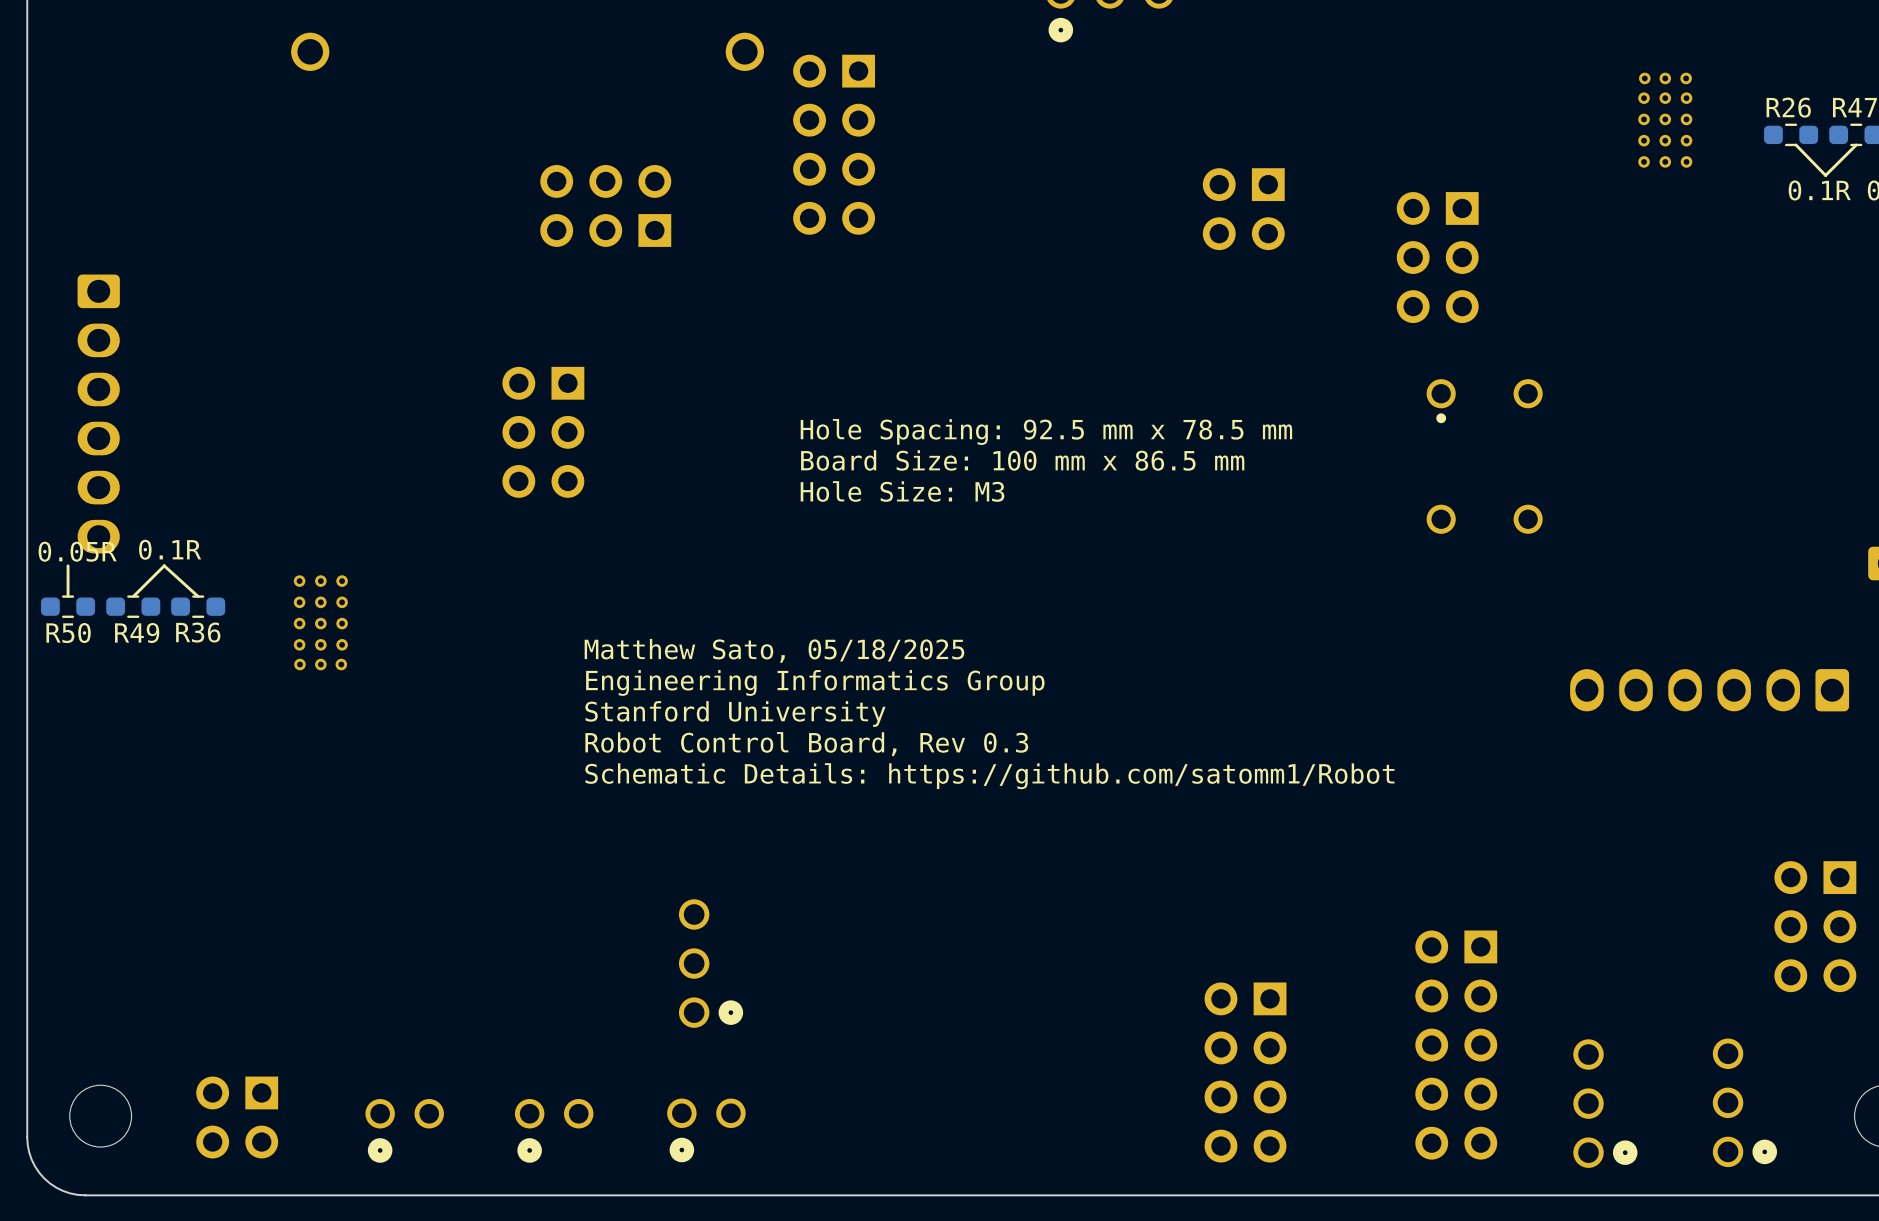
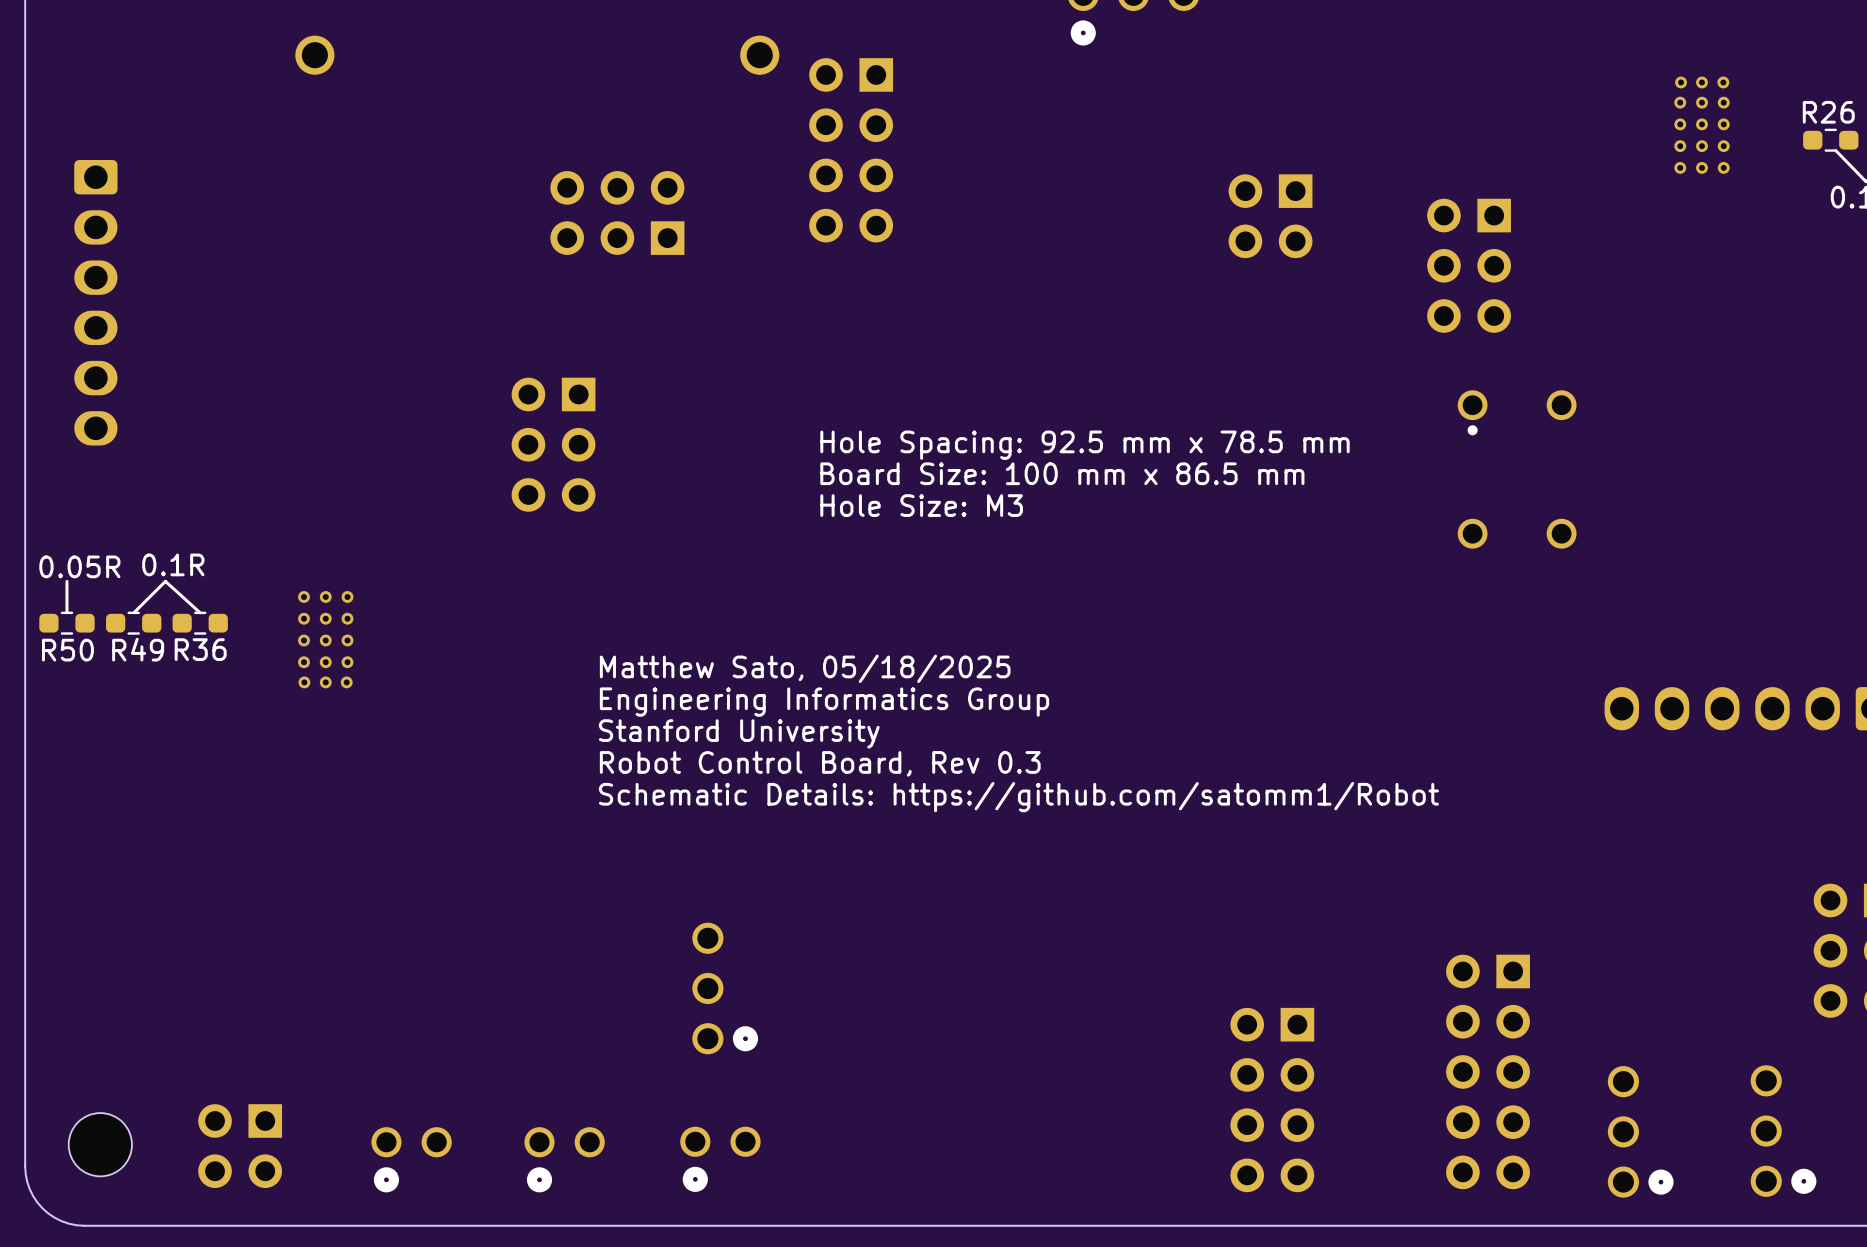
part position: (98, 414) -> (95, 302)

